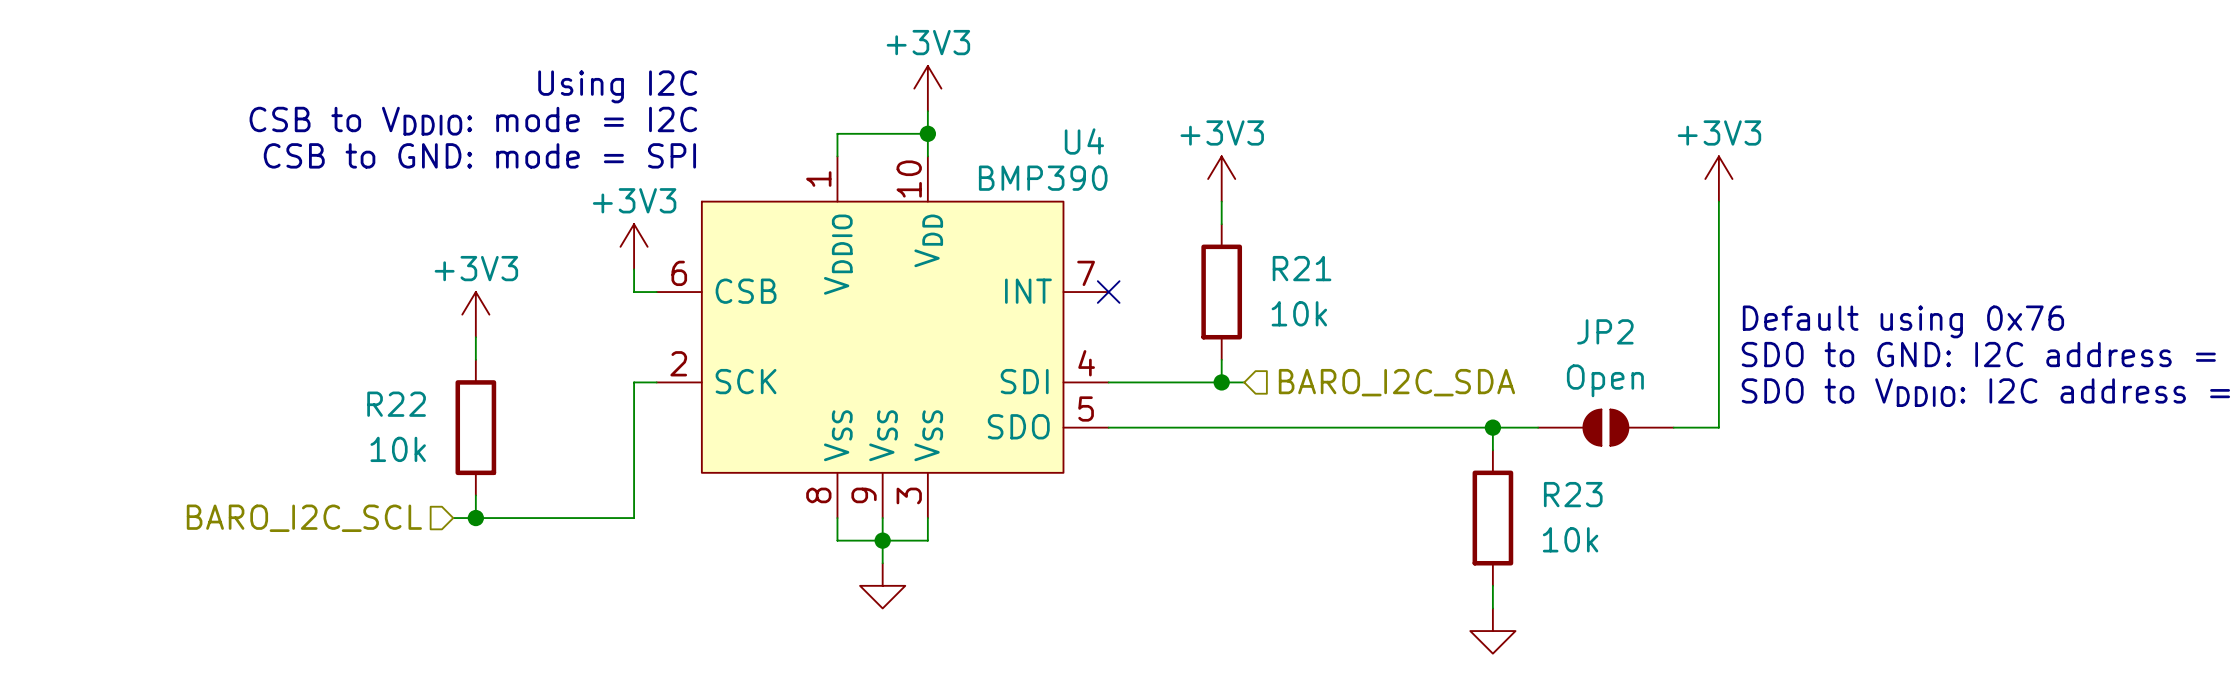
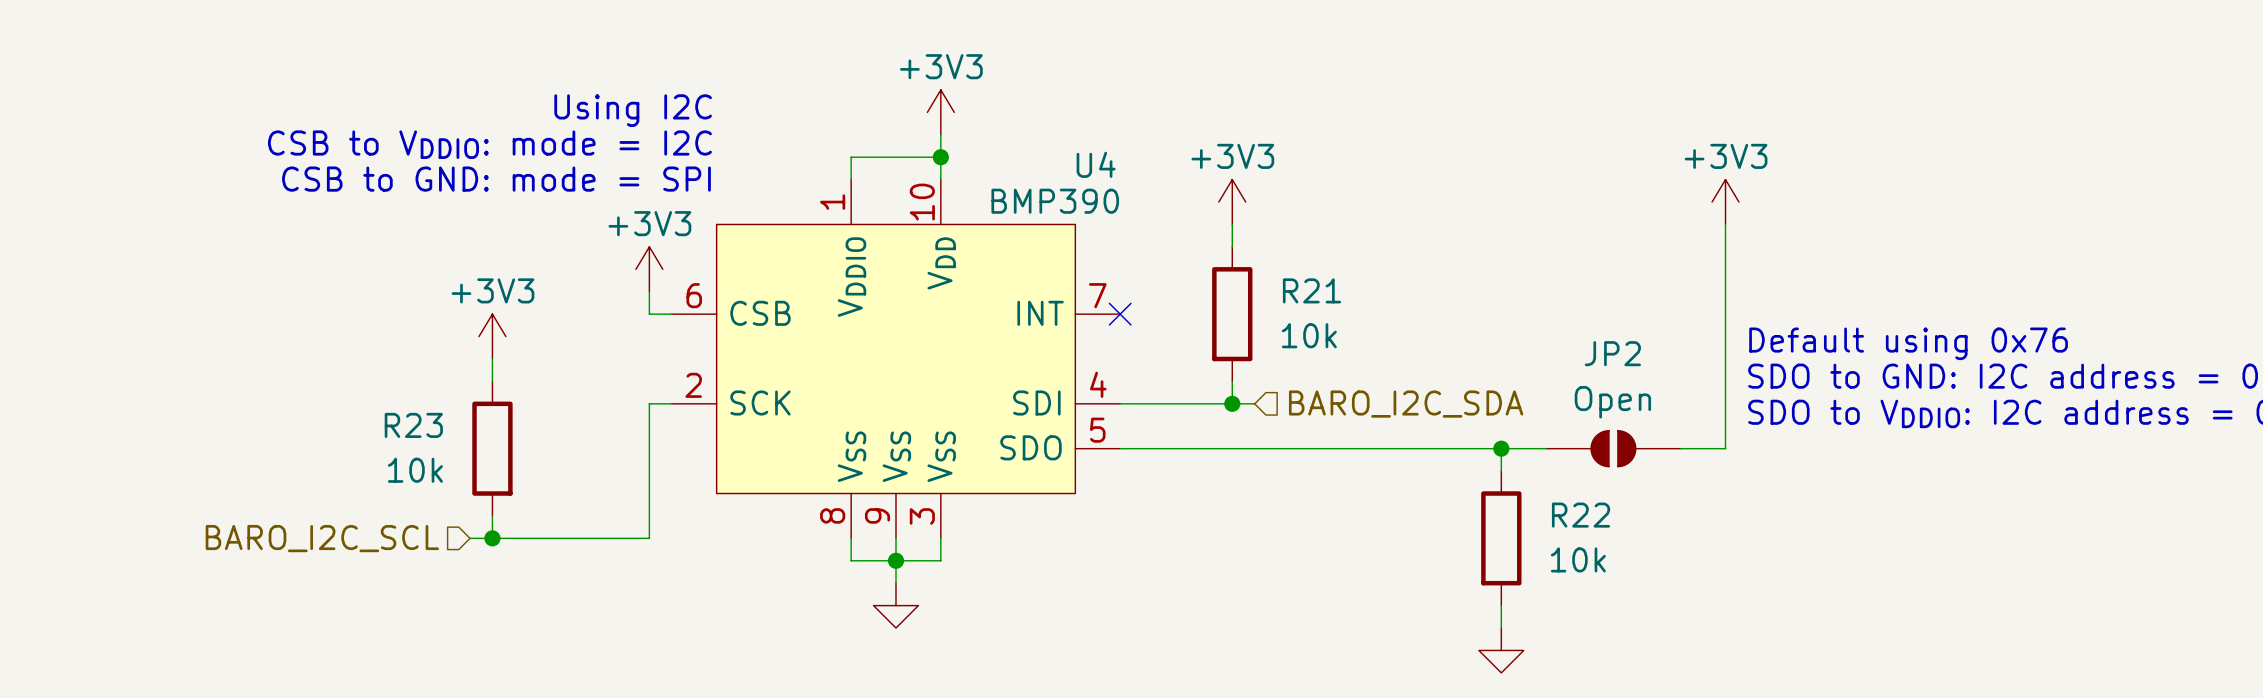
R22 name: R22 (396, 404) -> R23 (413, 425)
R23 name: R23 (1573, 494) -> R22 (1581, 515)

